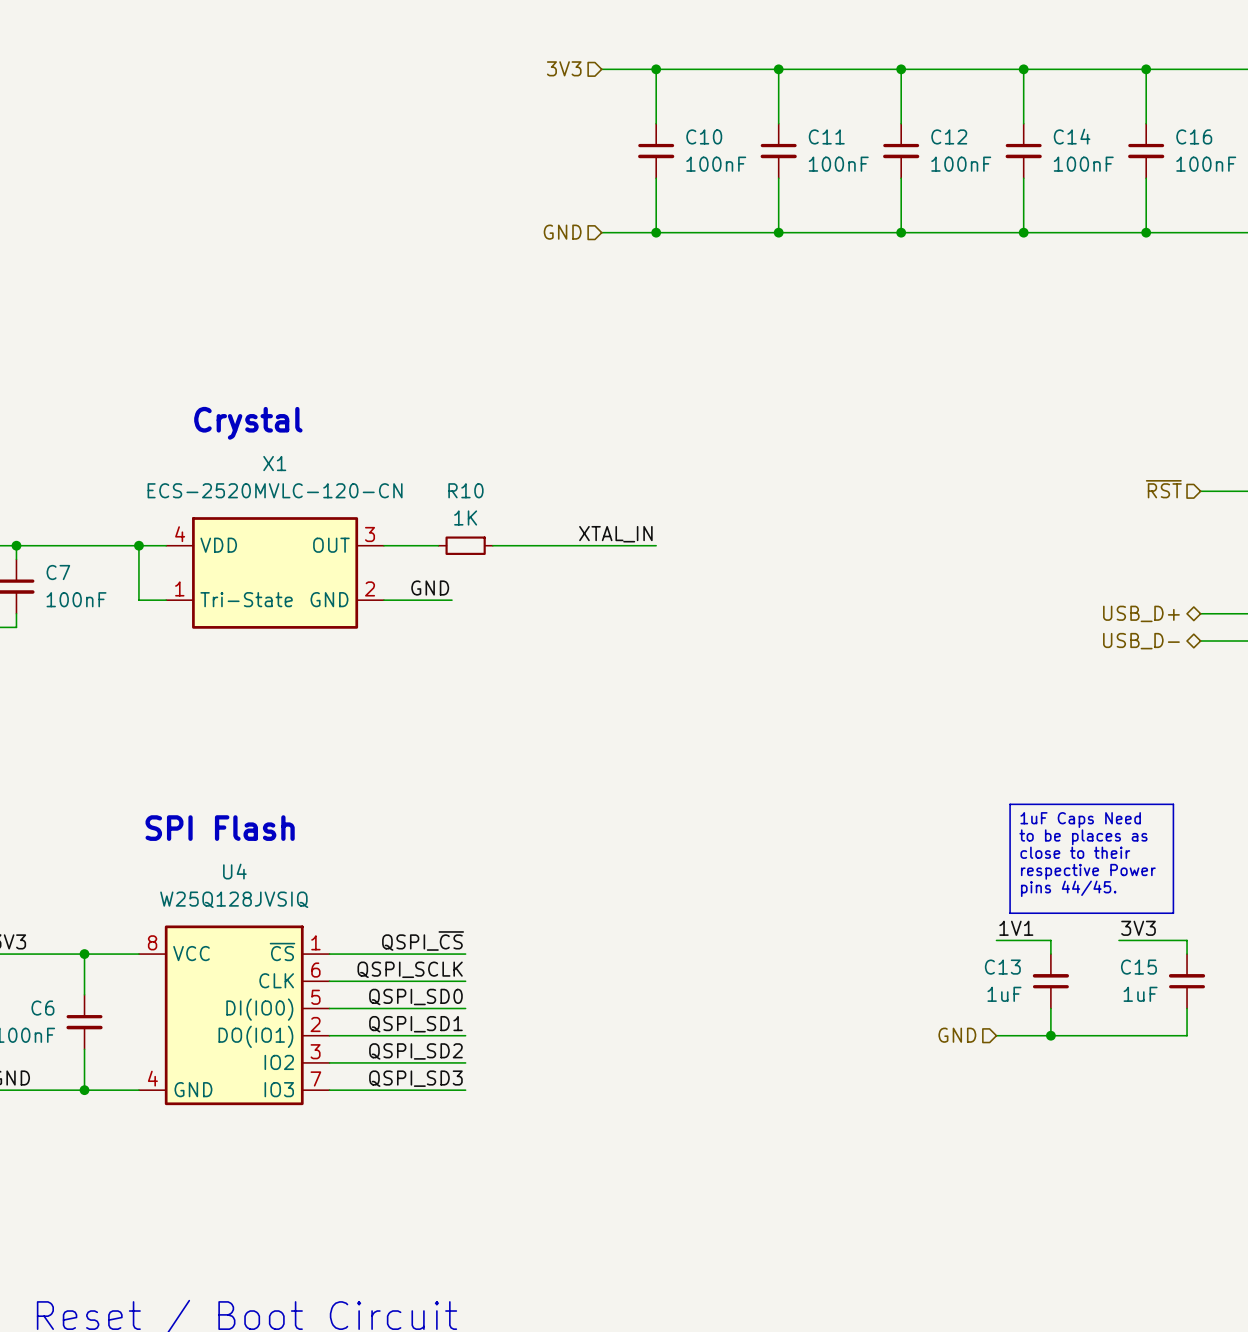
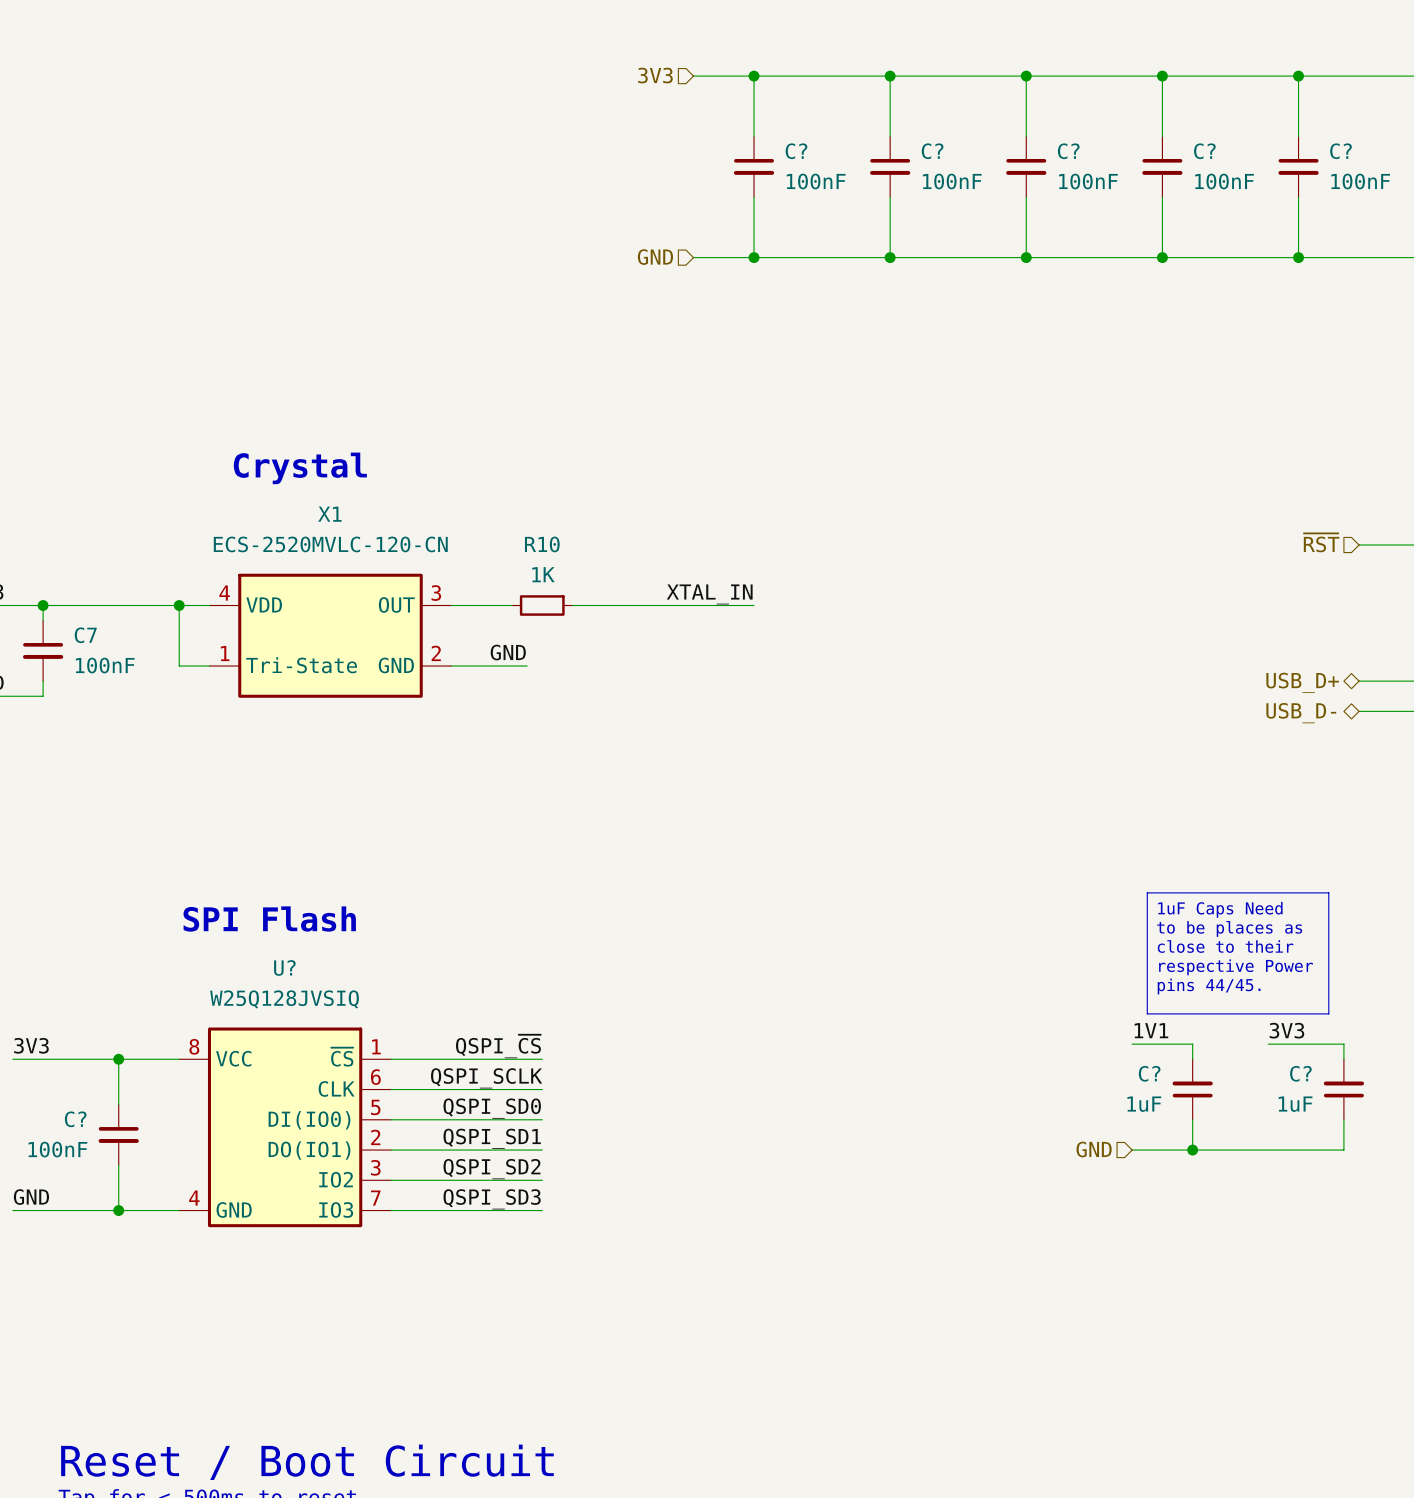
C10 name: C10 (704, 136) -> C? (796, 151)
C11 name: C11 (826, 136) -> C? (932, 151)
C12 name: C12 (949, 136) -> C? (1068, 151)
C14 name: C14 (1072, 136) -> C? (1204, 151)
C16 name: C16 (1194, 136) -> C? (1341, 151)
U4 name: U4 (234, 871) -> U? (284, 967)
C13 name: C13 (1002, 967) -> C? (1149, 1073)
C15 name: C15 (1138, 967) -> C? (1300, 1073)
C6 name: C6 (42, 1008) -> C? (75, 1119)

